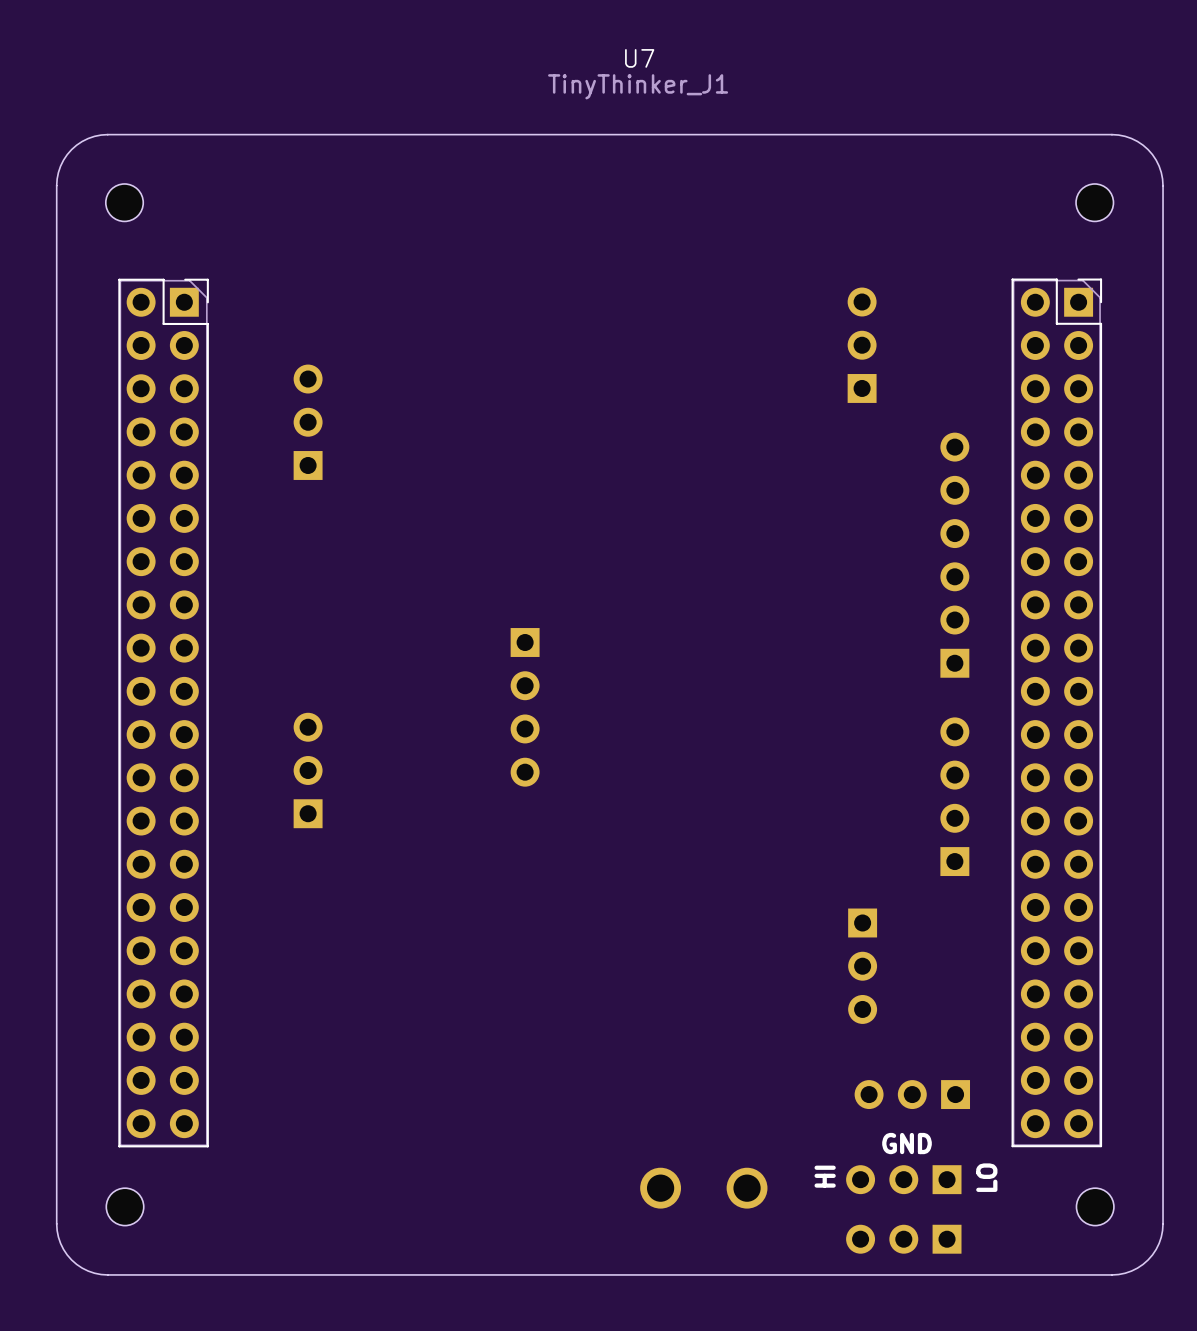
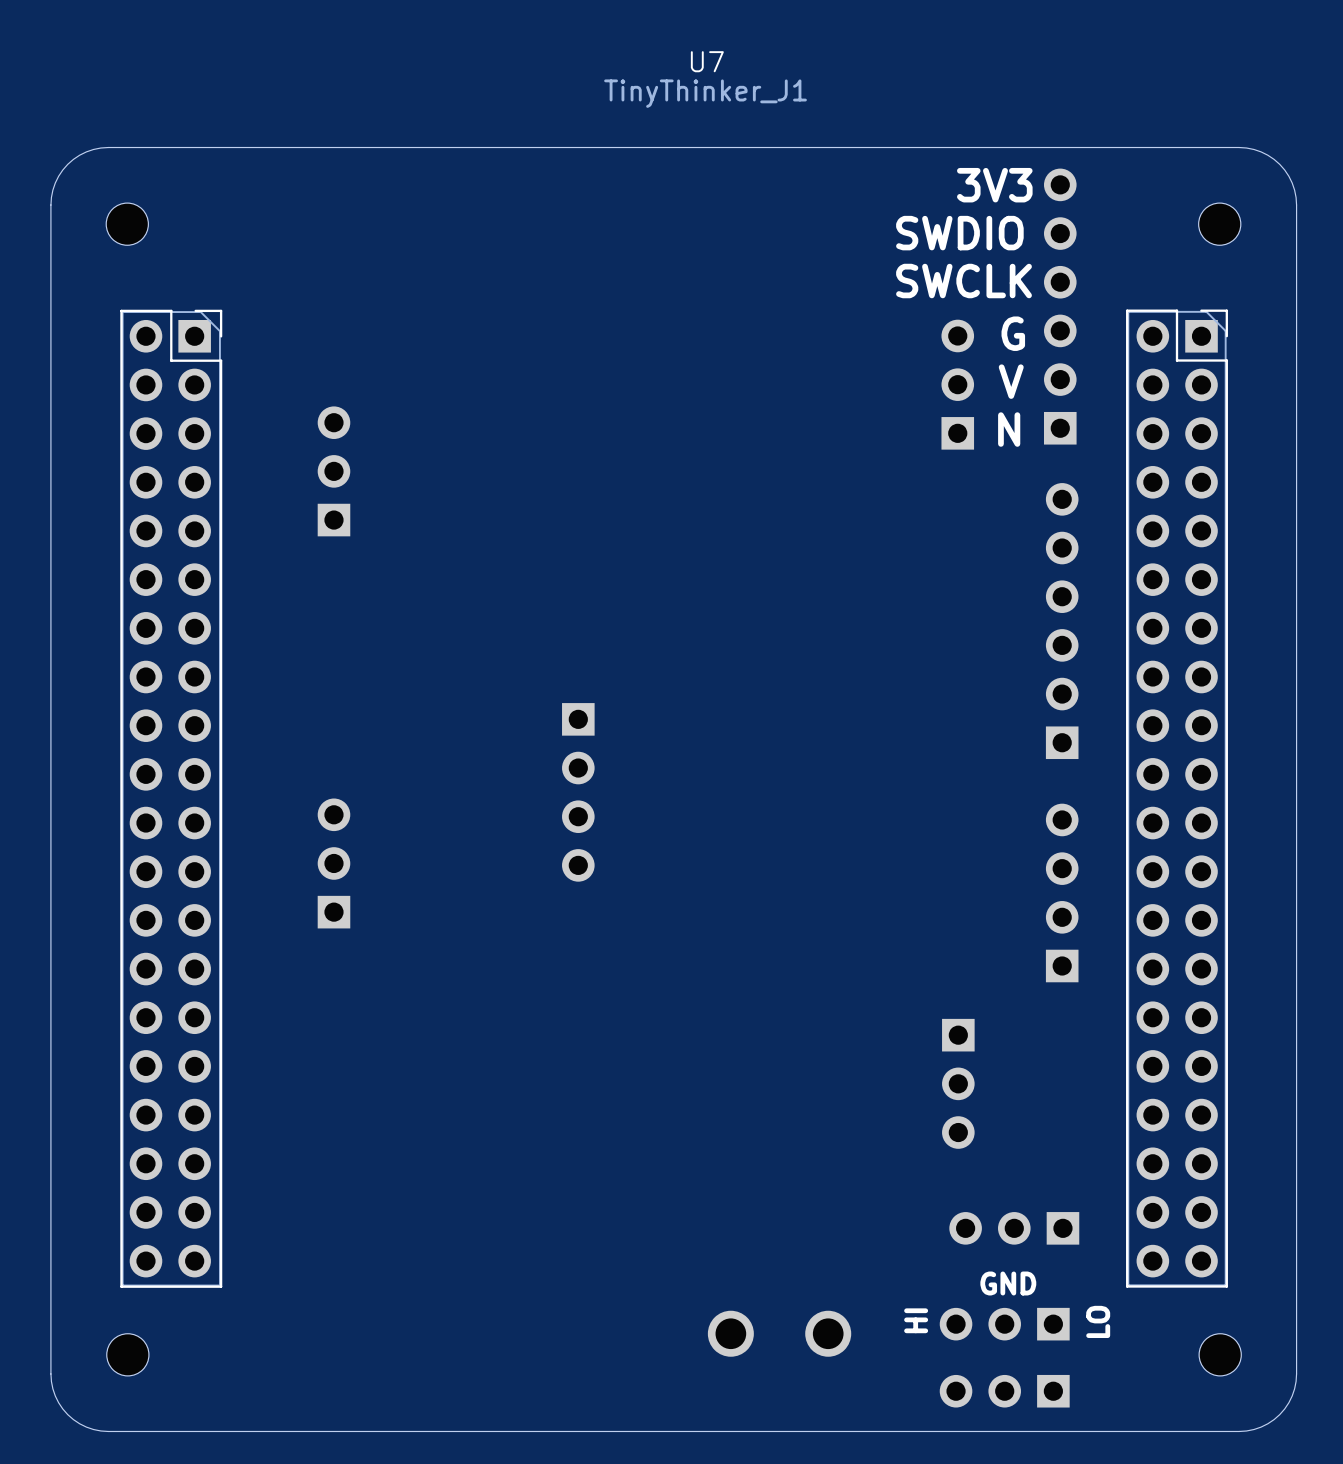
text: none -> 3V3 (994, 185)
text: none -> SWDIO (959, 233)
text: none -> SWCLK (964, 281)
part: none -> (1060, 306)
text: none -> G (1013, 333)
text: none -> V (1011, 381)
text: none -> N (1009, 429)

